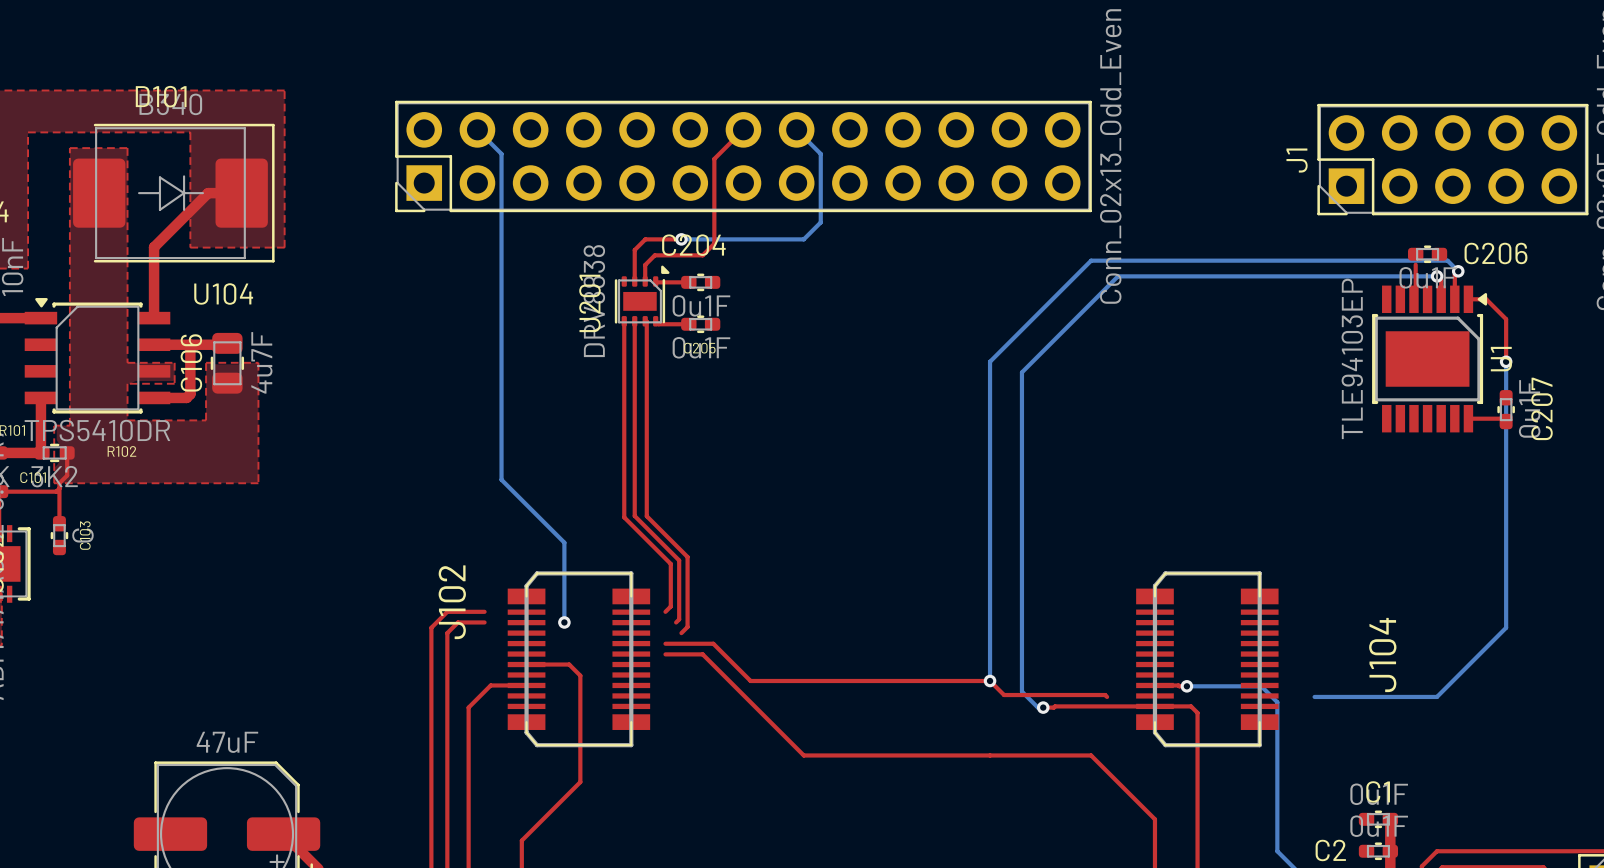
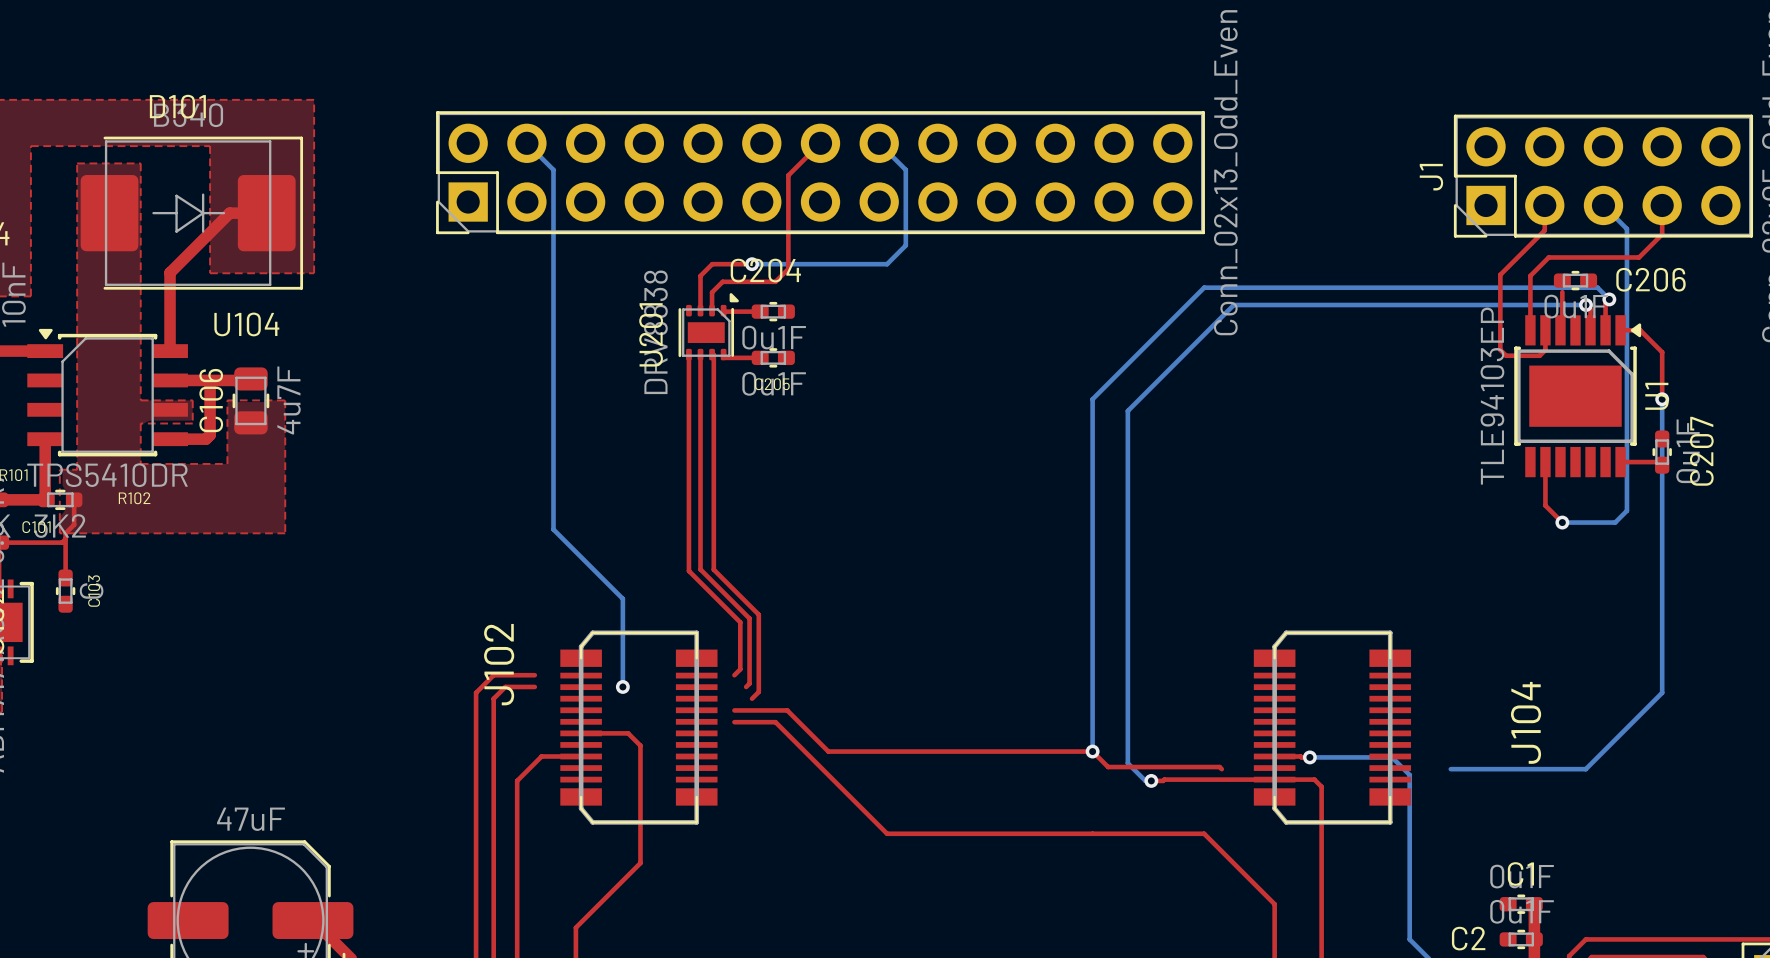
top track: none -> (1544, 205) (1544, 230) (1500, 274) (1500, 349) (1506, 355) (1539, 355) (1545, 350) (1545, 330)
bottom track: none -> (1603, 205) (1626, 228) (1626, 510) (1615, 522) (1562, 522)
top track: none -> (1662, 205) (1662, 234) (1639, 257) (1548, 257) (1530, 275) (1530, 330)
top track: none -> (1545, 462) (1545, 505) (1562, 522)
via: none -> (1562, 522)

